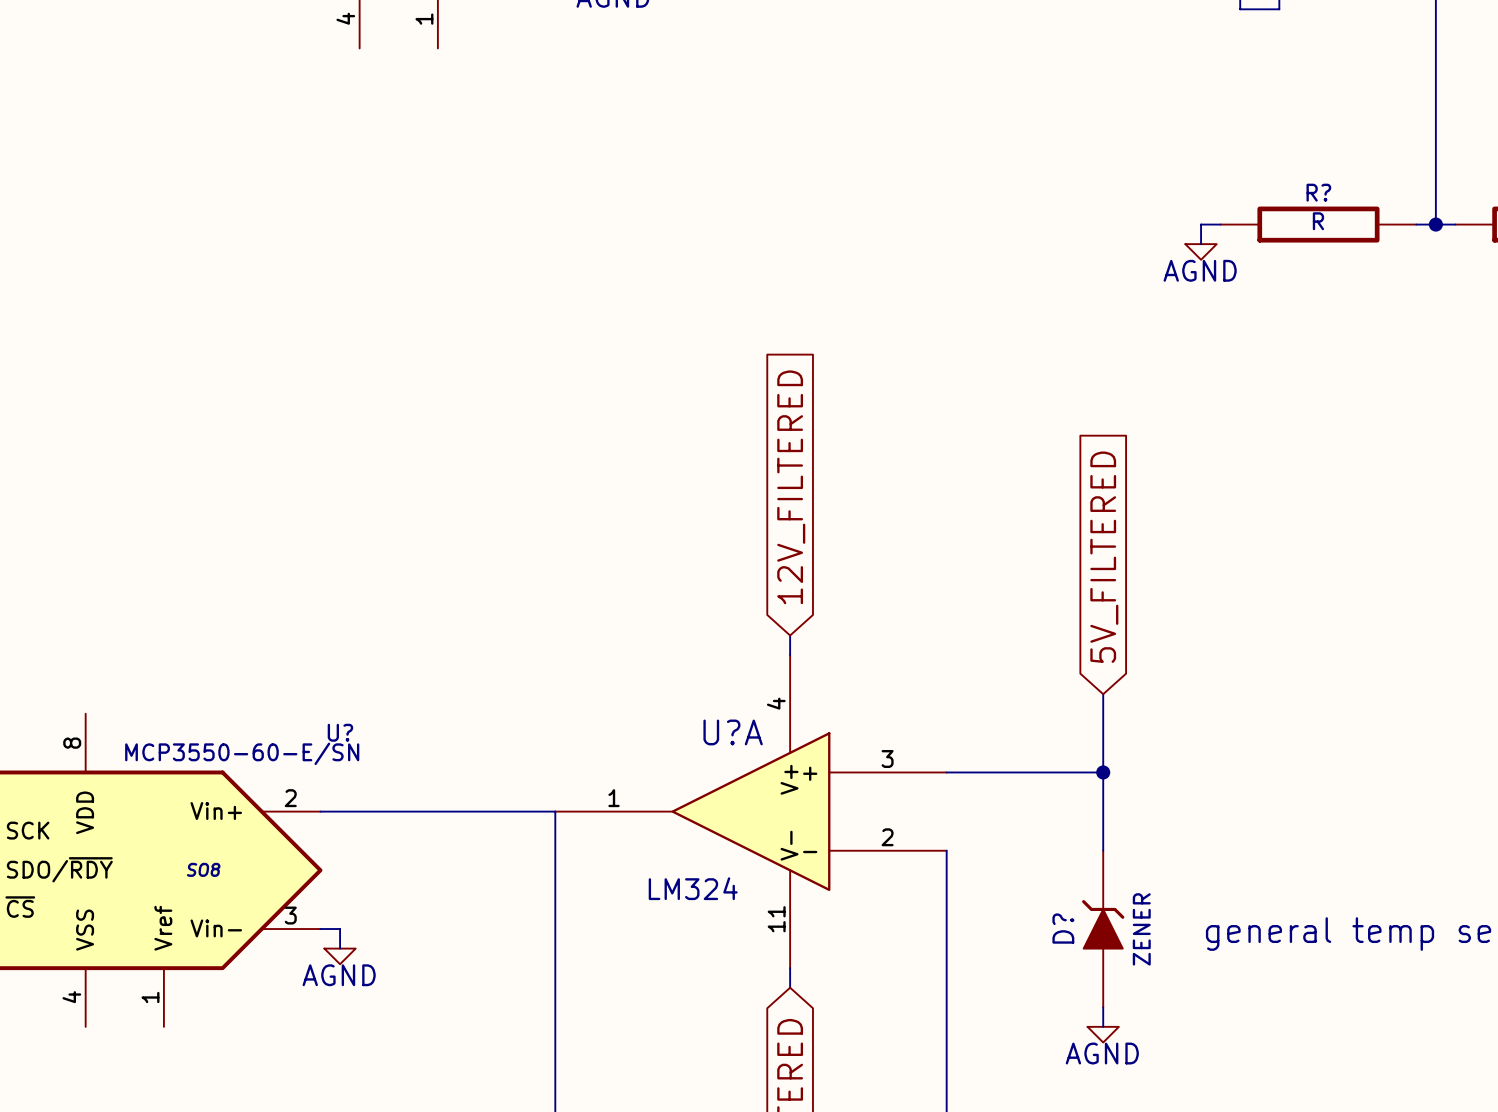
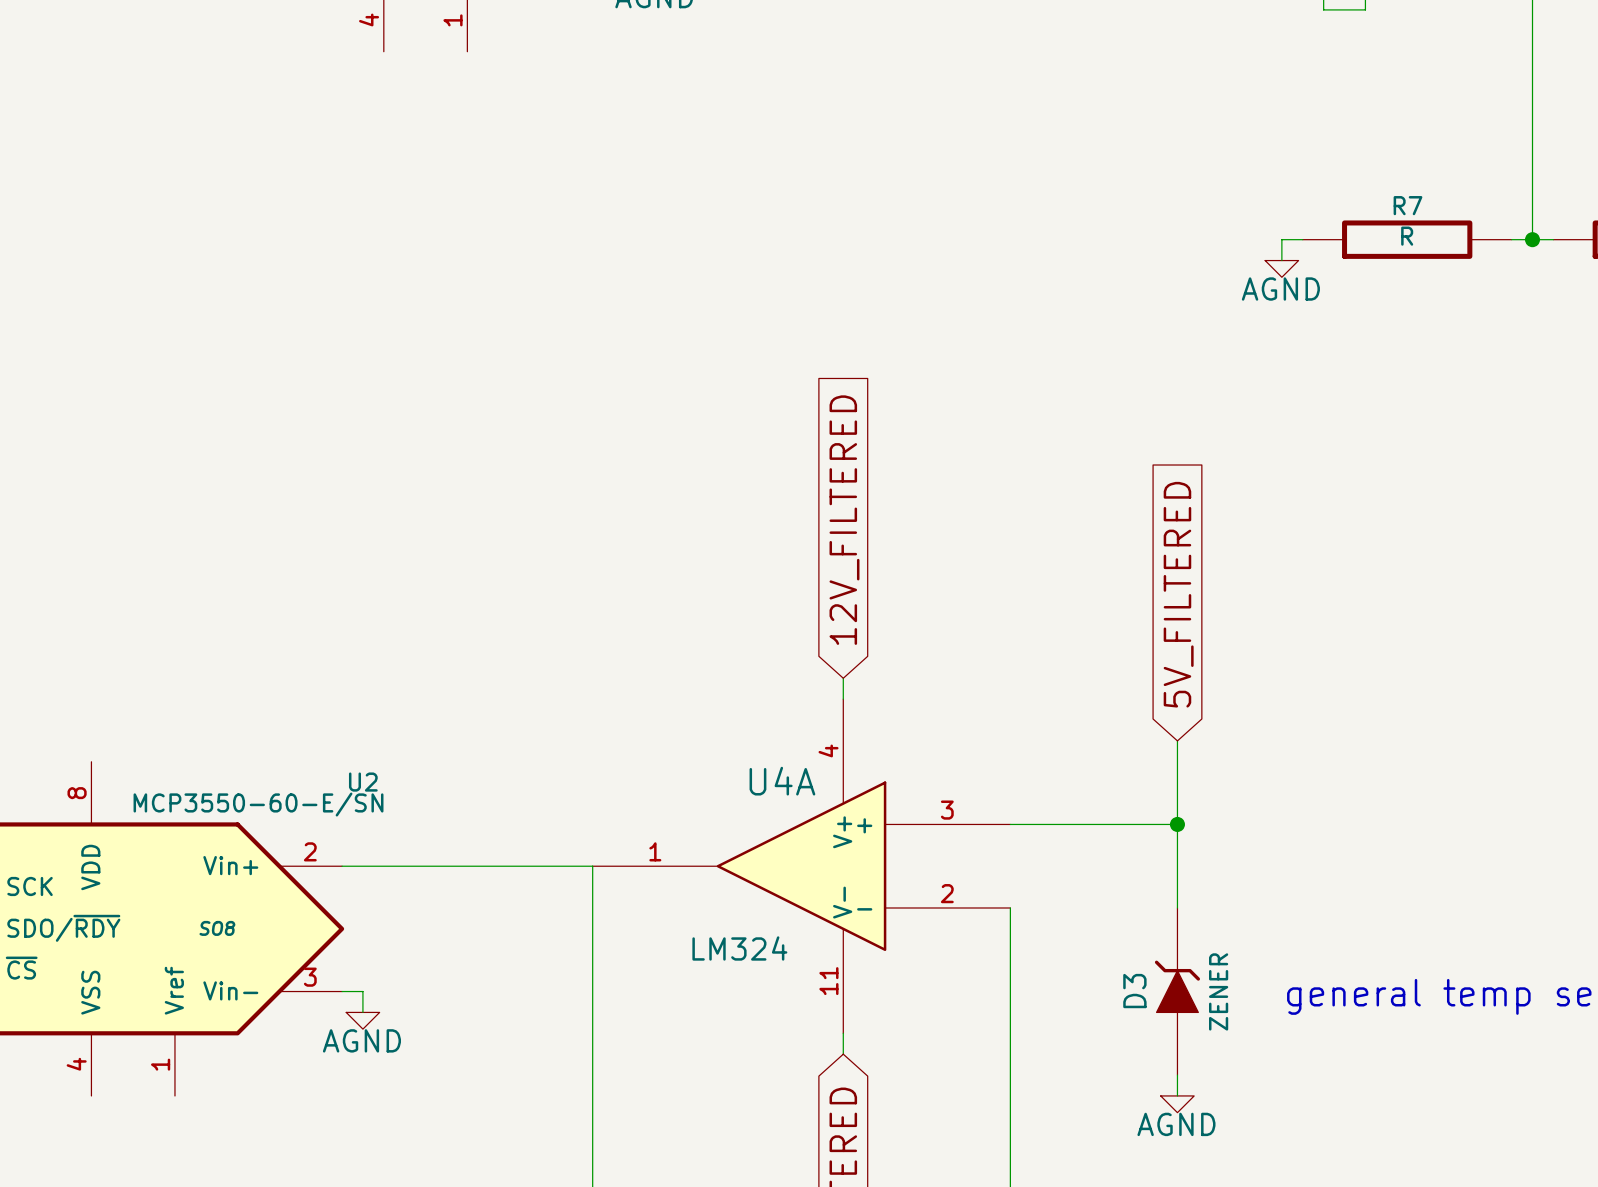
R? name: R? (1318, 192) -> R7 (1407, 205)
U? name: U? (340, 732) -> U2 (363, 782)
U?A name: U?A (733, 732) -> U4A (782, 781)
D? name: D? (1063, 928) -> D3 (1134, 991)

